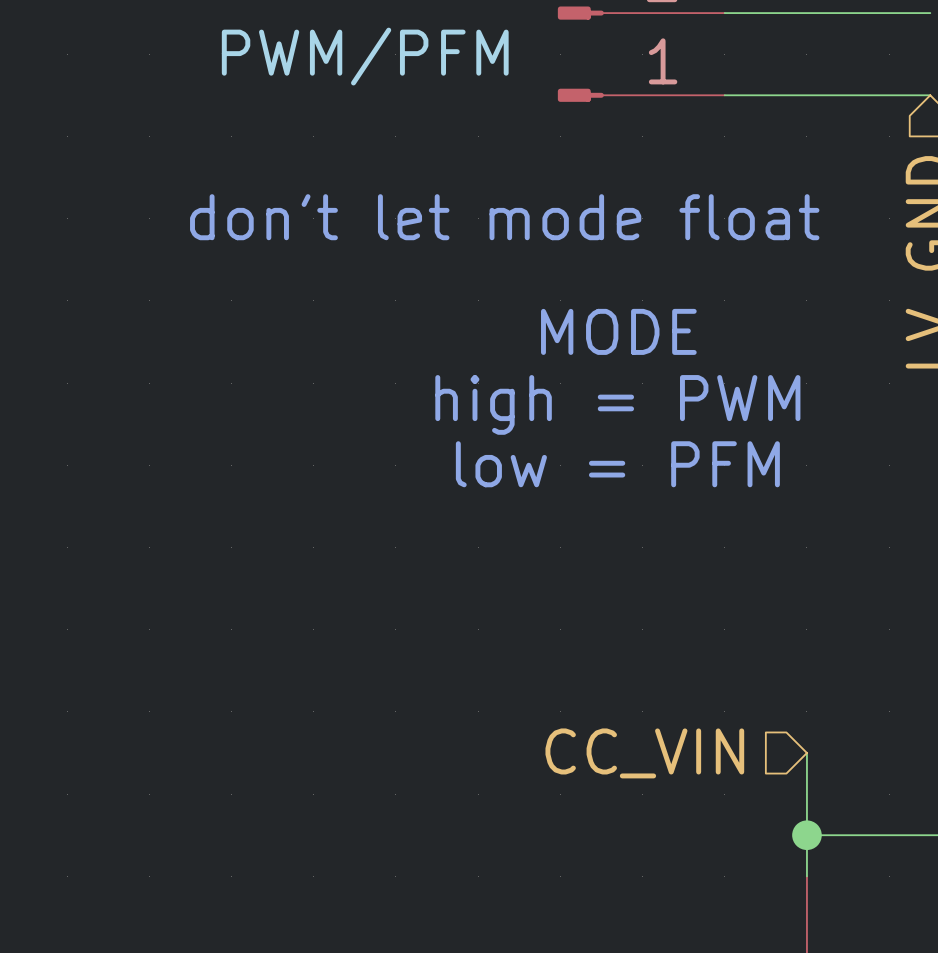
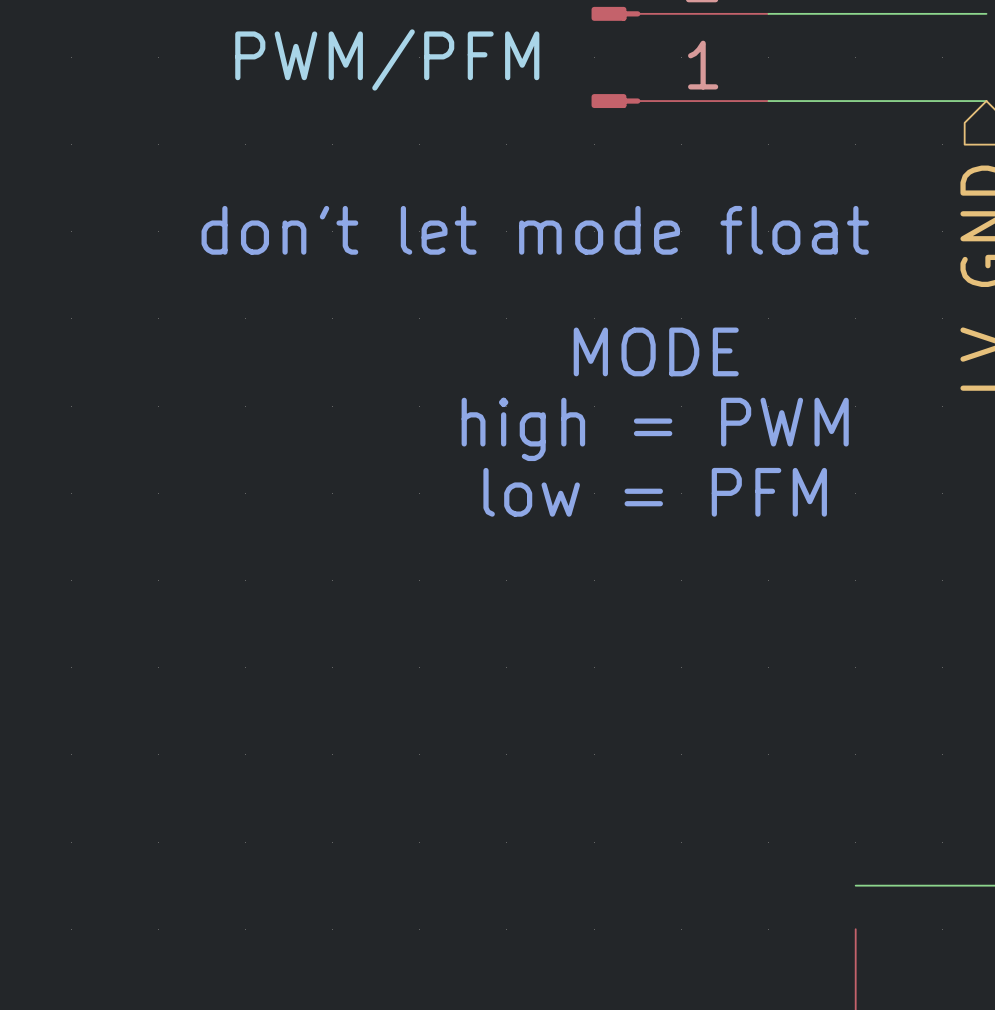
hierarchical label: CC_VIN (644, 753) -> none
wire: (806, 753) (806, 876) -> none
junction: (806, 835) -> none

